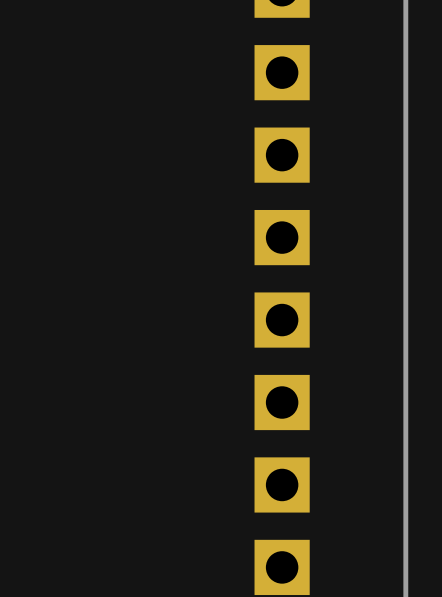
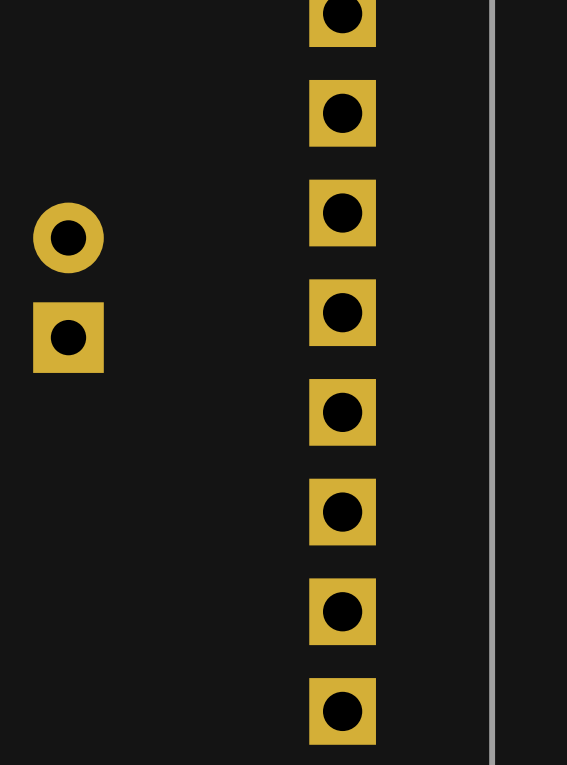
part: none -> (68, 287)

